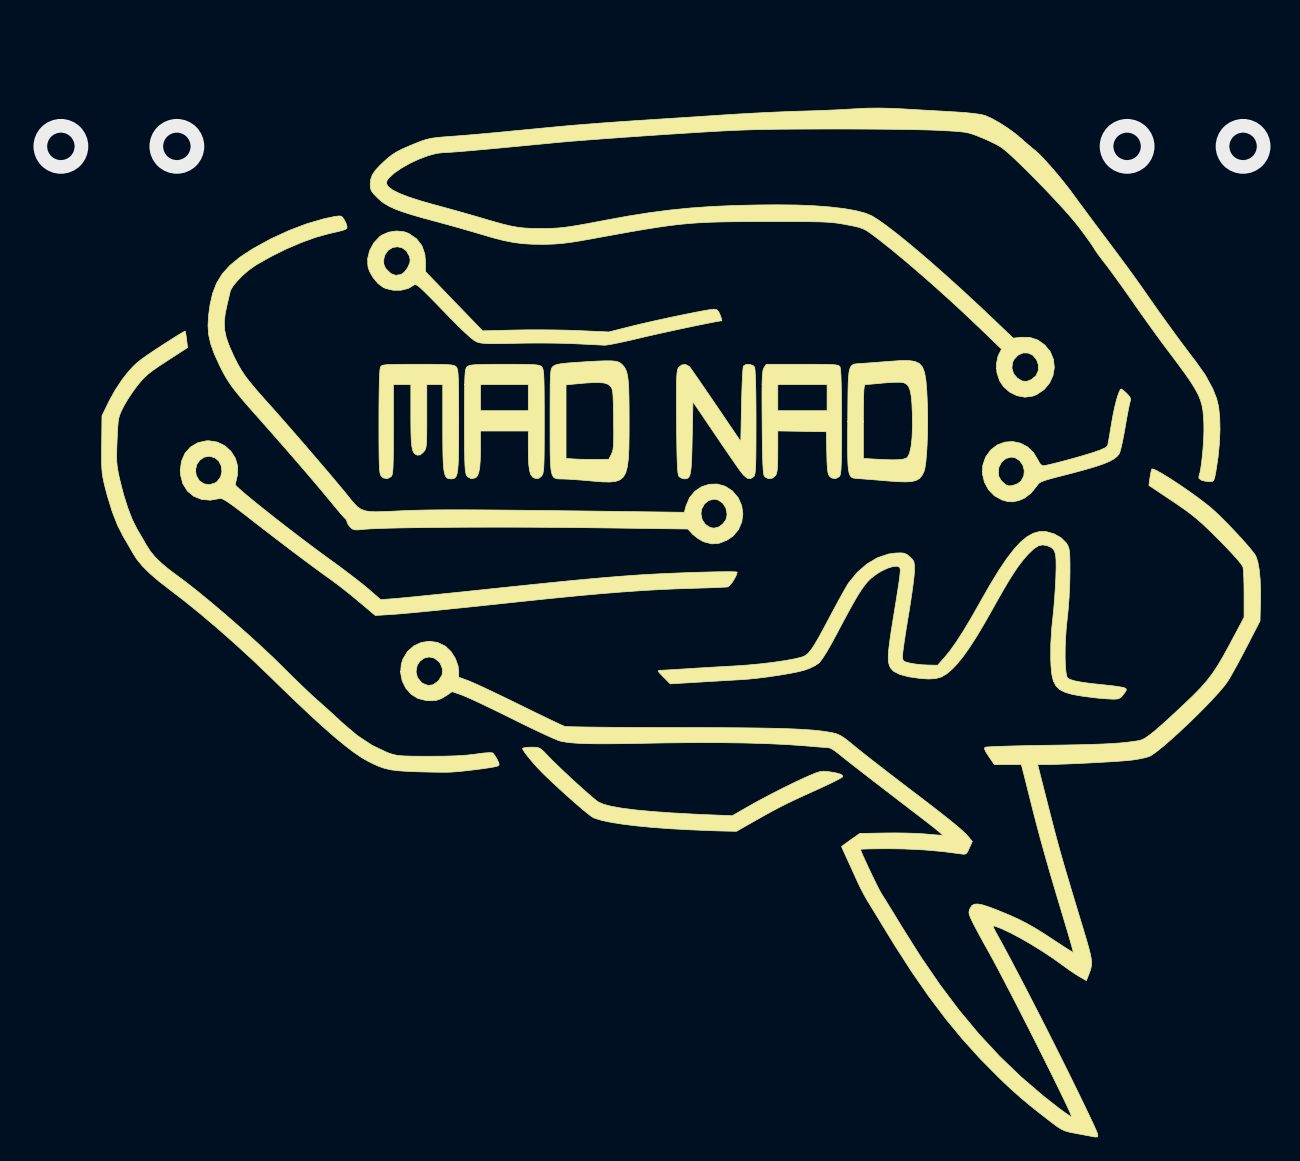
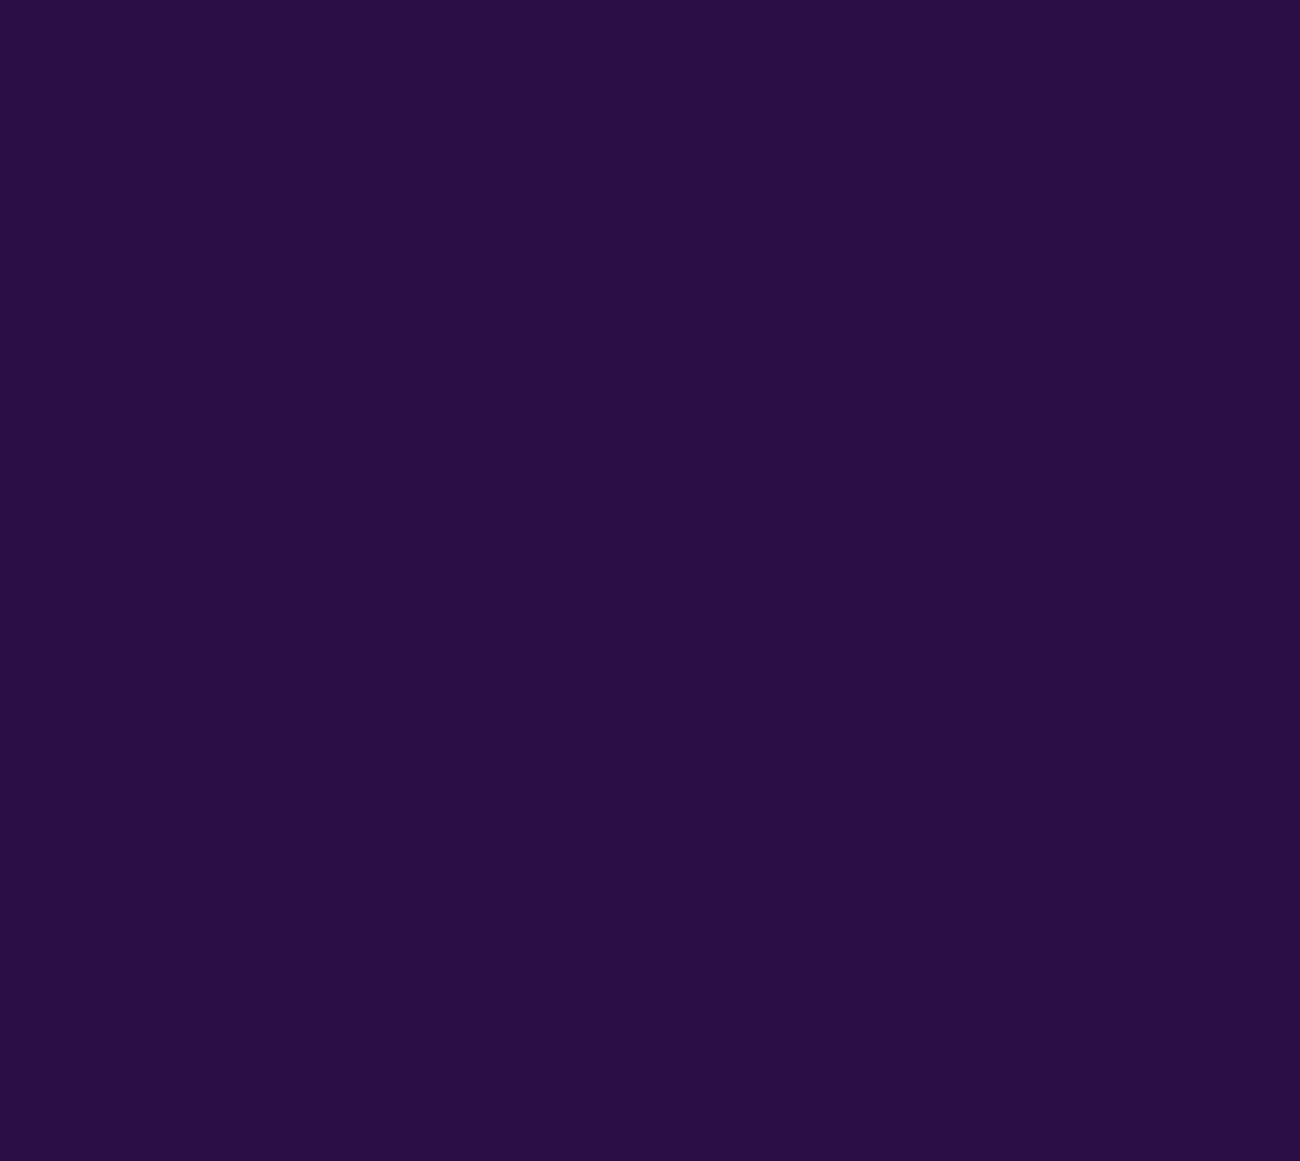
drawing: [101, 107, 1261, 1138] -> none
via: (60, 146) -> none
via: (176, 146) -> none
via: (1127, 146) -> none
via: (1243, 146) -> none

